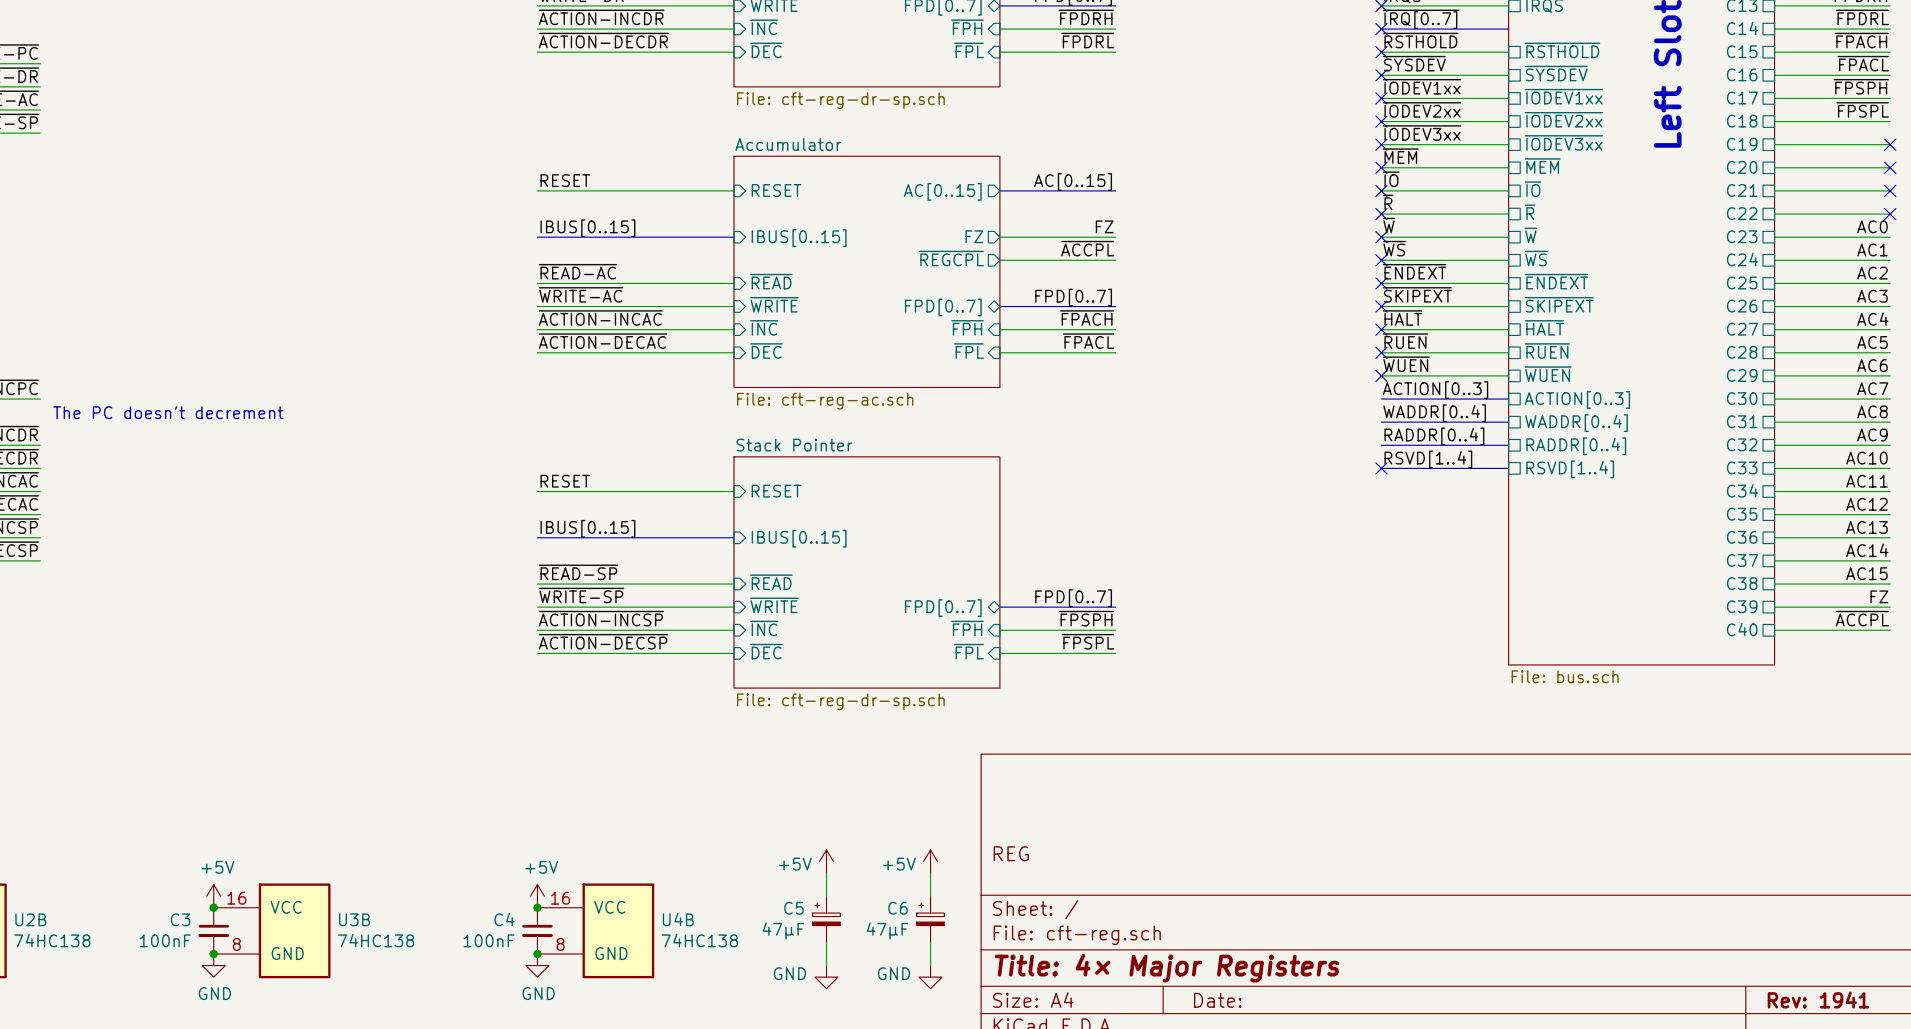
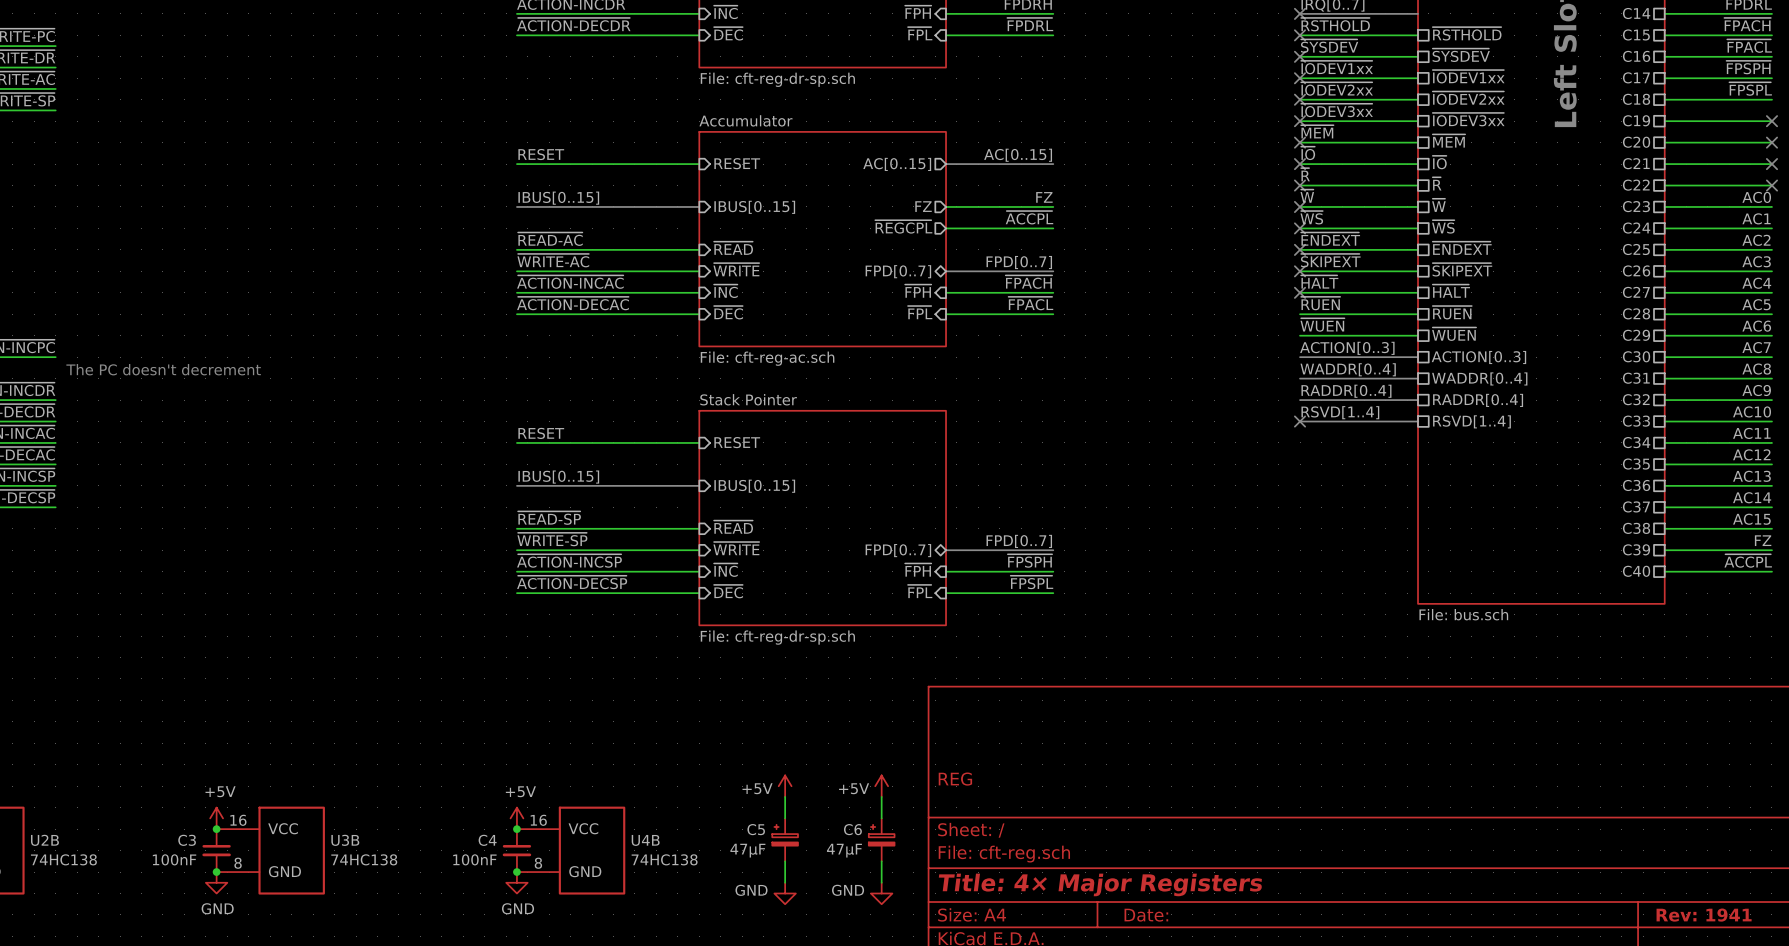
no-connect mark: (1381, 352) -> none
no-connect mark: (1381, 375) -> none

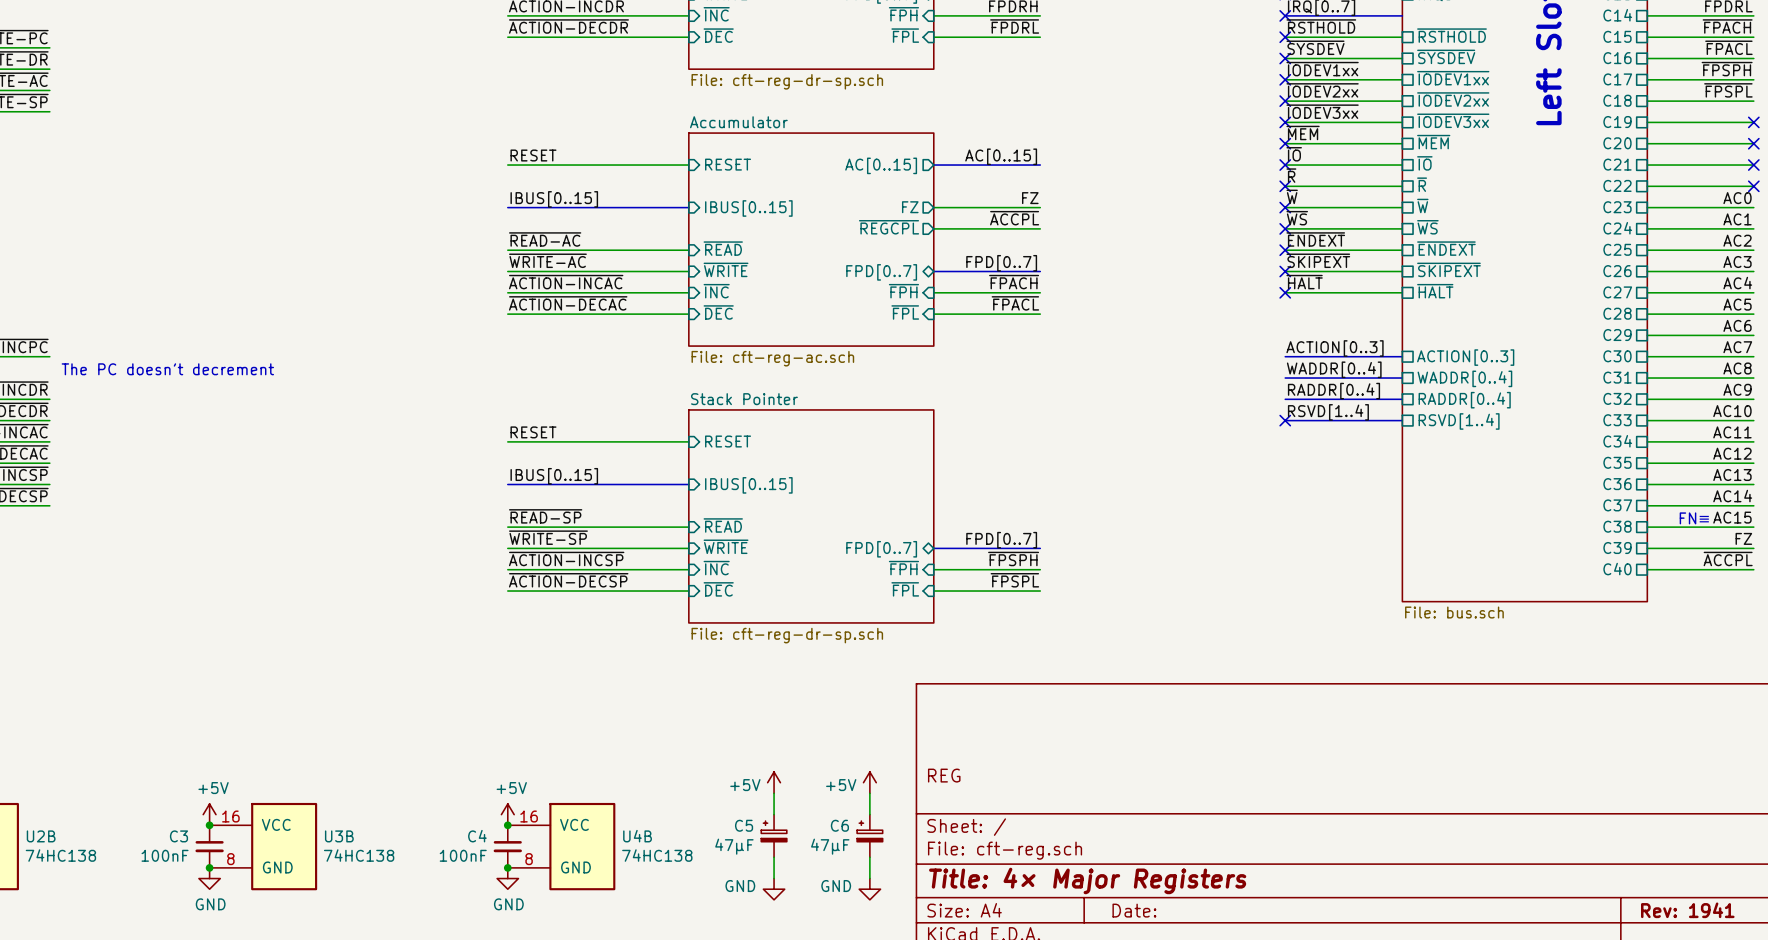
label: ~{RUEN} (1320, 303) -> none
sheet pin: ~{RUEN} (1452, 312) -> none
wire: (1300, 314) (1418, 314) -> none
label: ~{WUEN} (1322, 325) -> none
sheet pin: ~{WUEN} (1454, 334) -> none
wire: (1300, 335) (1418, 335) -> none
text: none -> FN≡ (1694, 518)

